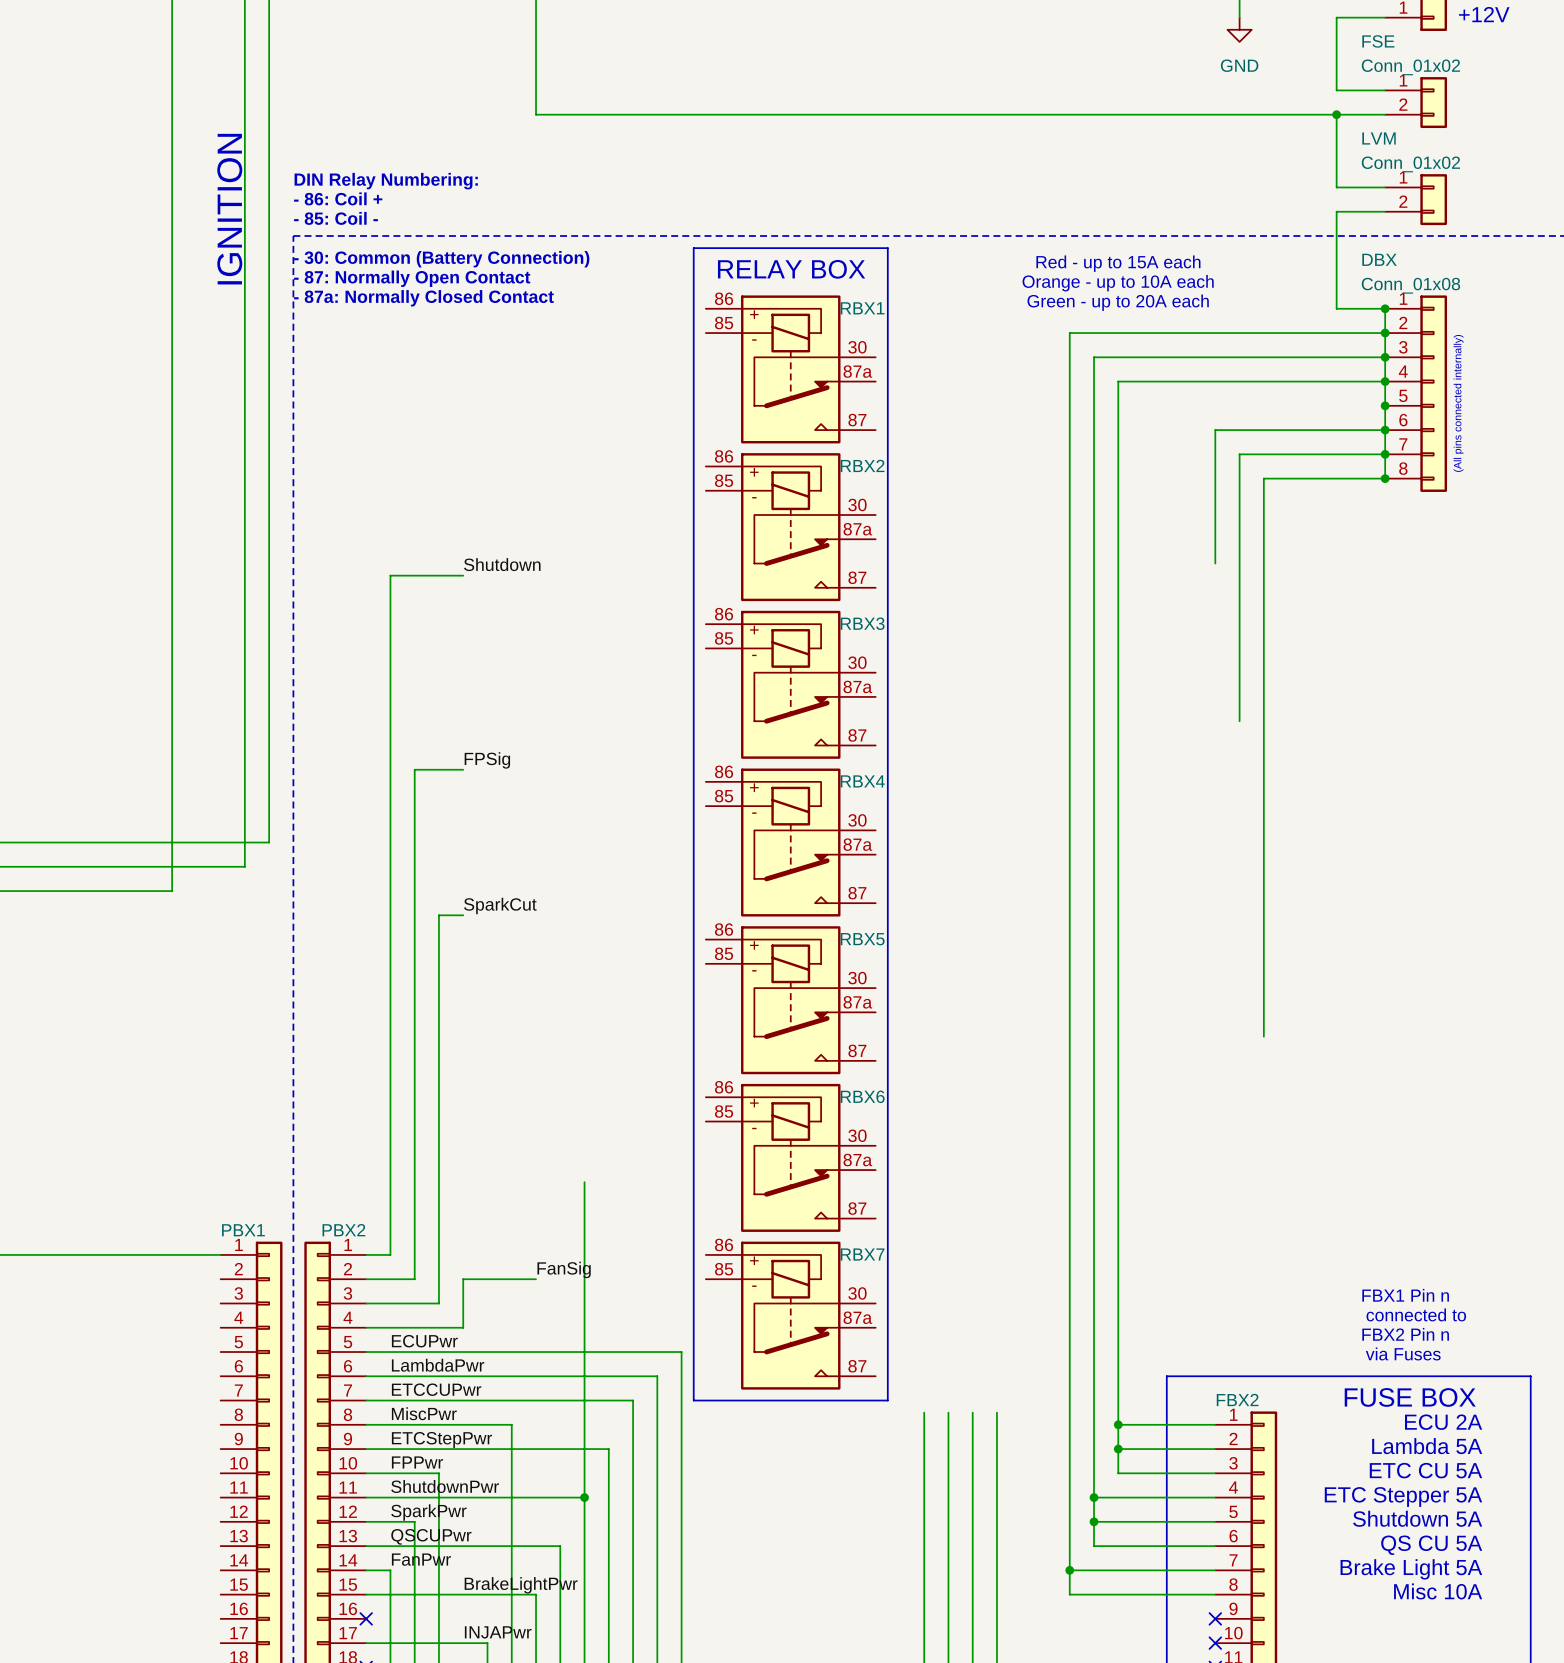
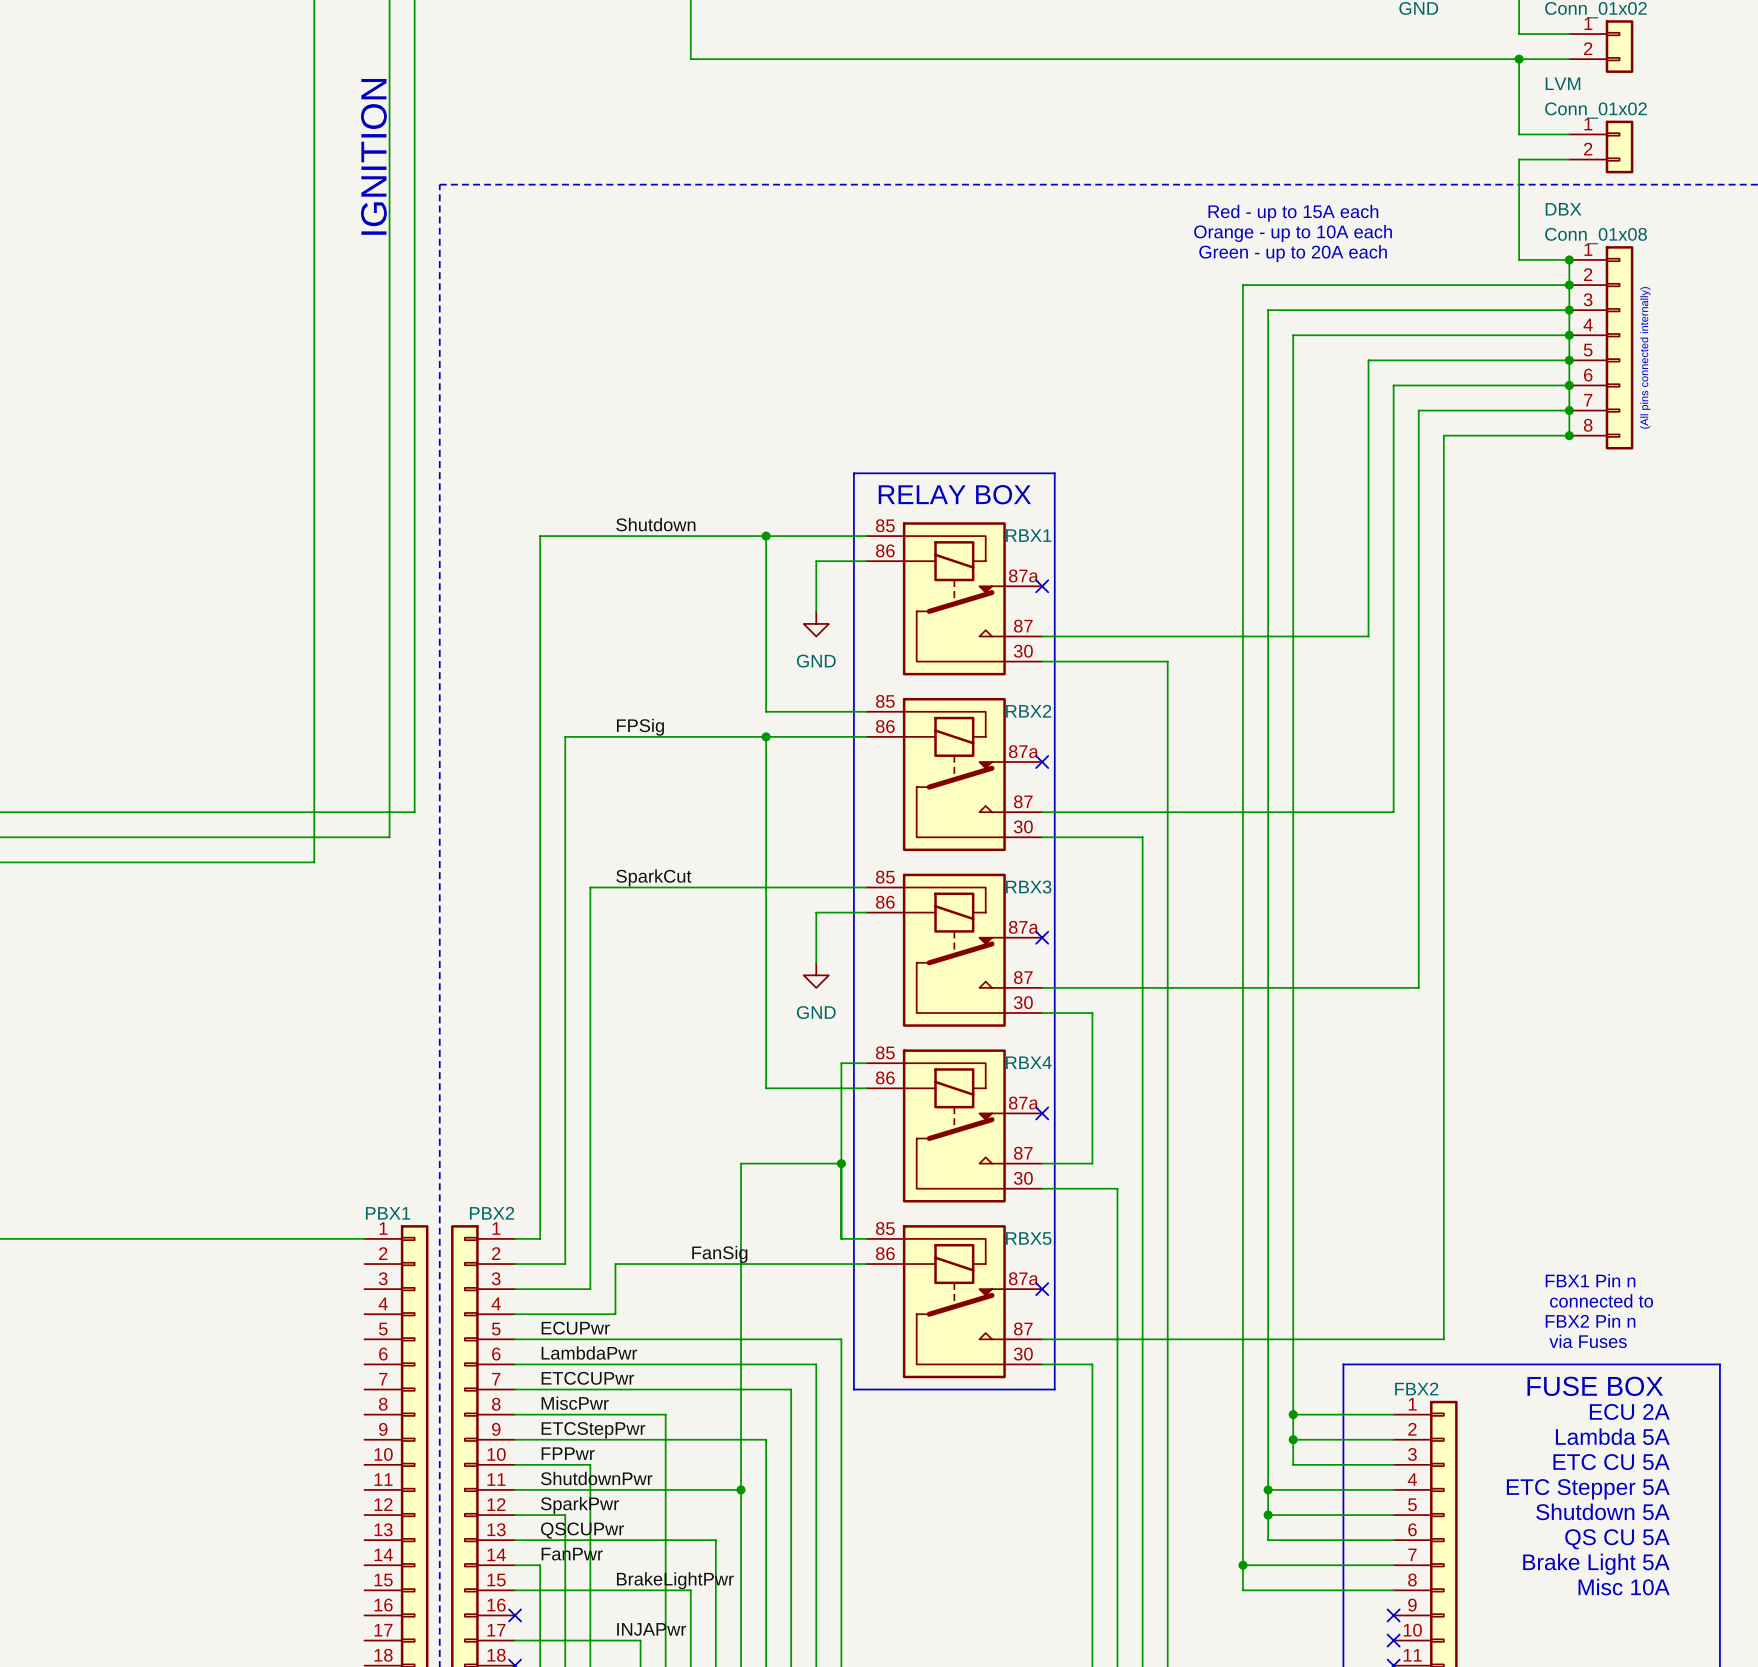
text: DIN Relay Numbering: (386, 181) -> none
text: - 86: Coil + (338, 198) -> none
text: - 85: Coil - (336, 218) -> none
text: - 30: Common (Battery Connection) (441, 259) -> none
text: RELAY BOX (791, 269) -> none
text: - 87: Normally Open Contact (412, 278) -> none
RBX1 symbol: [705, 295, 876, 444] -> [866, 522, 1043, 676]
text: - 87a: Normally Closed Contact (423, 298) -> none
wire: none -> (1569, 360) (1368, 360) (1368, 636) (1042, 636)
RBX2 symbol: [705, 453, 876, 602] -> [866, 697, 1043, 852]
line: (693, 515) (693, 248) (887, 248) (887, 515) -> (853, 473) (1054, 473)
text: none -> RELAY BOX (954, 494)
wire: none -> (1393, 523) (1393, 812) (1042, 812)
wire: none -> (615, 536) (866, 536)
wire: none -> (766, 536) (766, 711) (866, 711)
junction: none -> (766, 536)
wire: none -> (866, 561) (816, 561) (816, 611)
RBX3 symbol: [705, 610, 876, 759] -> [866, 873, 1043, 1027]
no-connect mark: none -> (1042, 586)
power symbol: none -> GND (816, 623)
wire: none -> (1042, 661) (1167, 661) (1167, 1402)
wire: none -> (1418, 686) (1418, 987) (1042, 987)
RBX4 symbol: [705, 768, 876, 917] -> [866, 1049, 1043, 1203]
wire: none -> (615, 736) (866, 736)
wire: none -> (766, 736) (766, 1088) (866, 1088)
junction: none -> (766, 736)
no-connect mark: none -> (1042, 761)
wire: none -> (1042, 837) (1142, 837) (1142, 1402)
wire: none -> (615, 887) (866, 887)
RBX5 symbol: [705, 926, 876, 1075] -> [866, 1225, 1043, 1379]
wire: none -> (866, 912) (816, 912) (816, 962)
no-connect mark: none -> (1042, 937)
power symbol: none -> GND (816, 975)
wire: none -> (1042, 1013) (1092, 1013) (1092, 1163) (1042, 1163)
wire: none -> (1443, 1013) (1443, 1339) (1042, 1339)
wire: none -> (866, 1063) (841, 1063) (841, 1238) (866, 1238)
no-connect mark: none -> (1042, 1113)
RBX6: (790, 1157) -> none
wire: none -> (740, 1163) (841, 1163)
junction: none -> (841, 1163)
wire: none -> (1042, 1188) (1117, 1188) (1117, 1402)
wire: none -> (690, 1264) (866, 1264)
no-connect mark: none -> (1042, 1289)
RBX7: (790, 1315) -> none
wire: none -> (1042, 1364) (1092, 1364) (1092, 1402)

